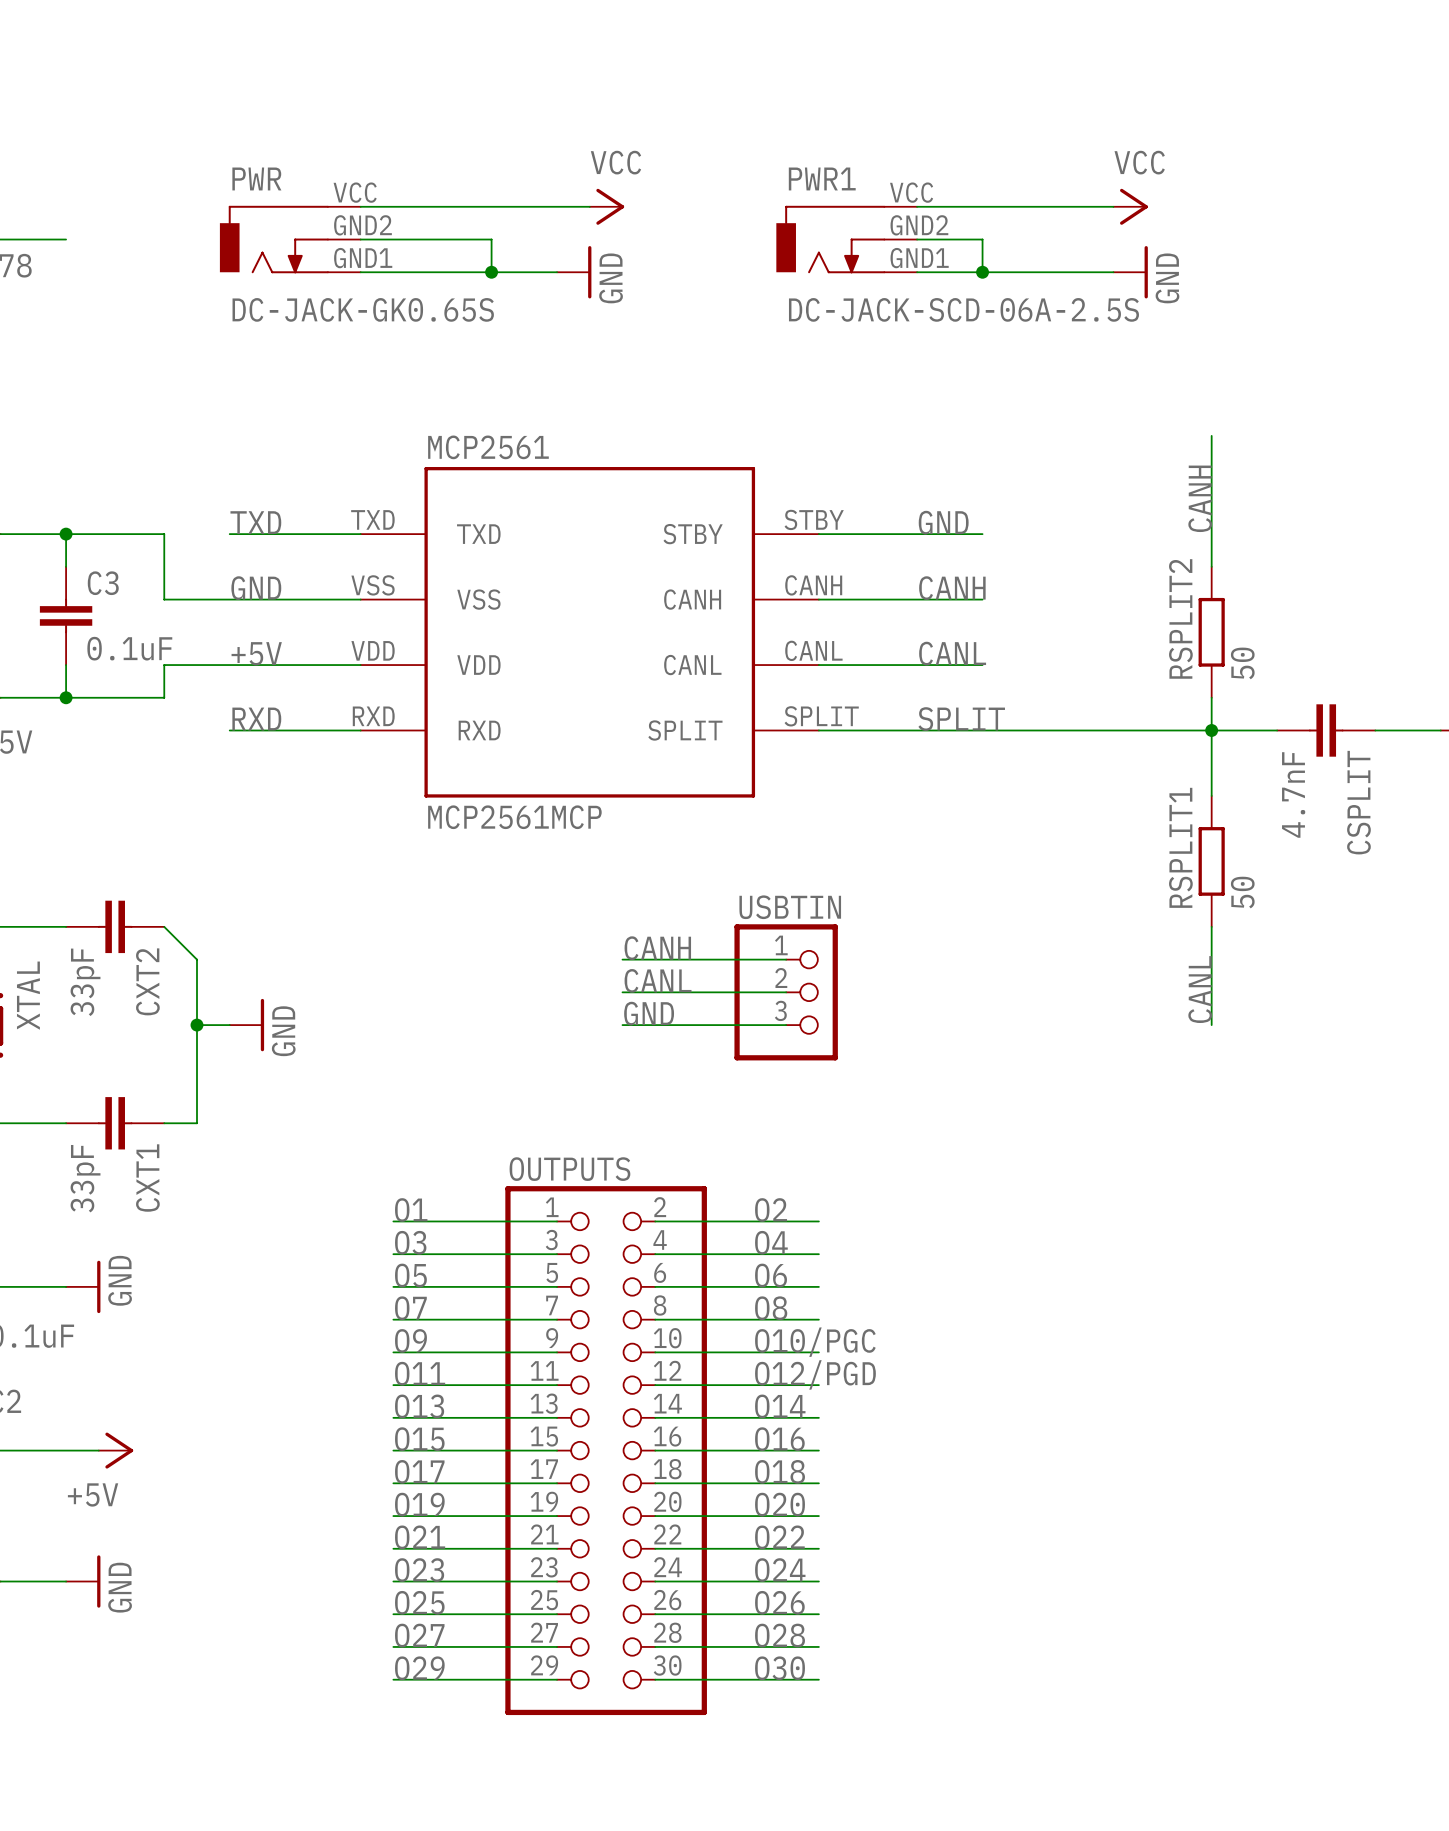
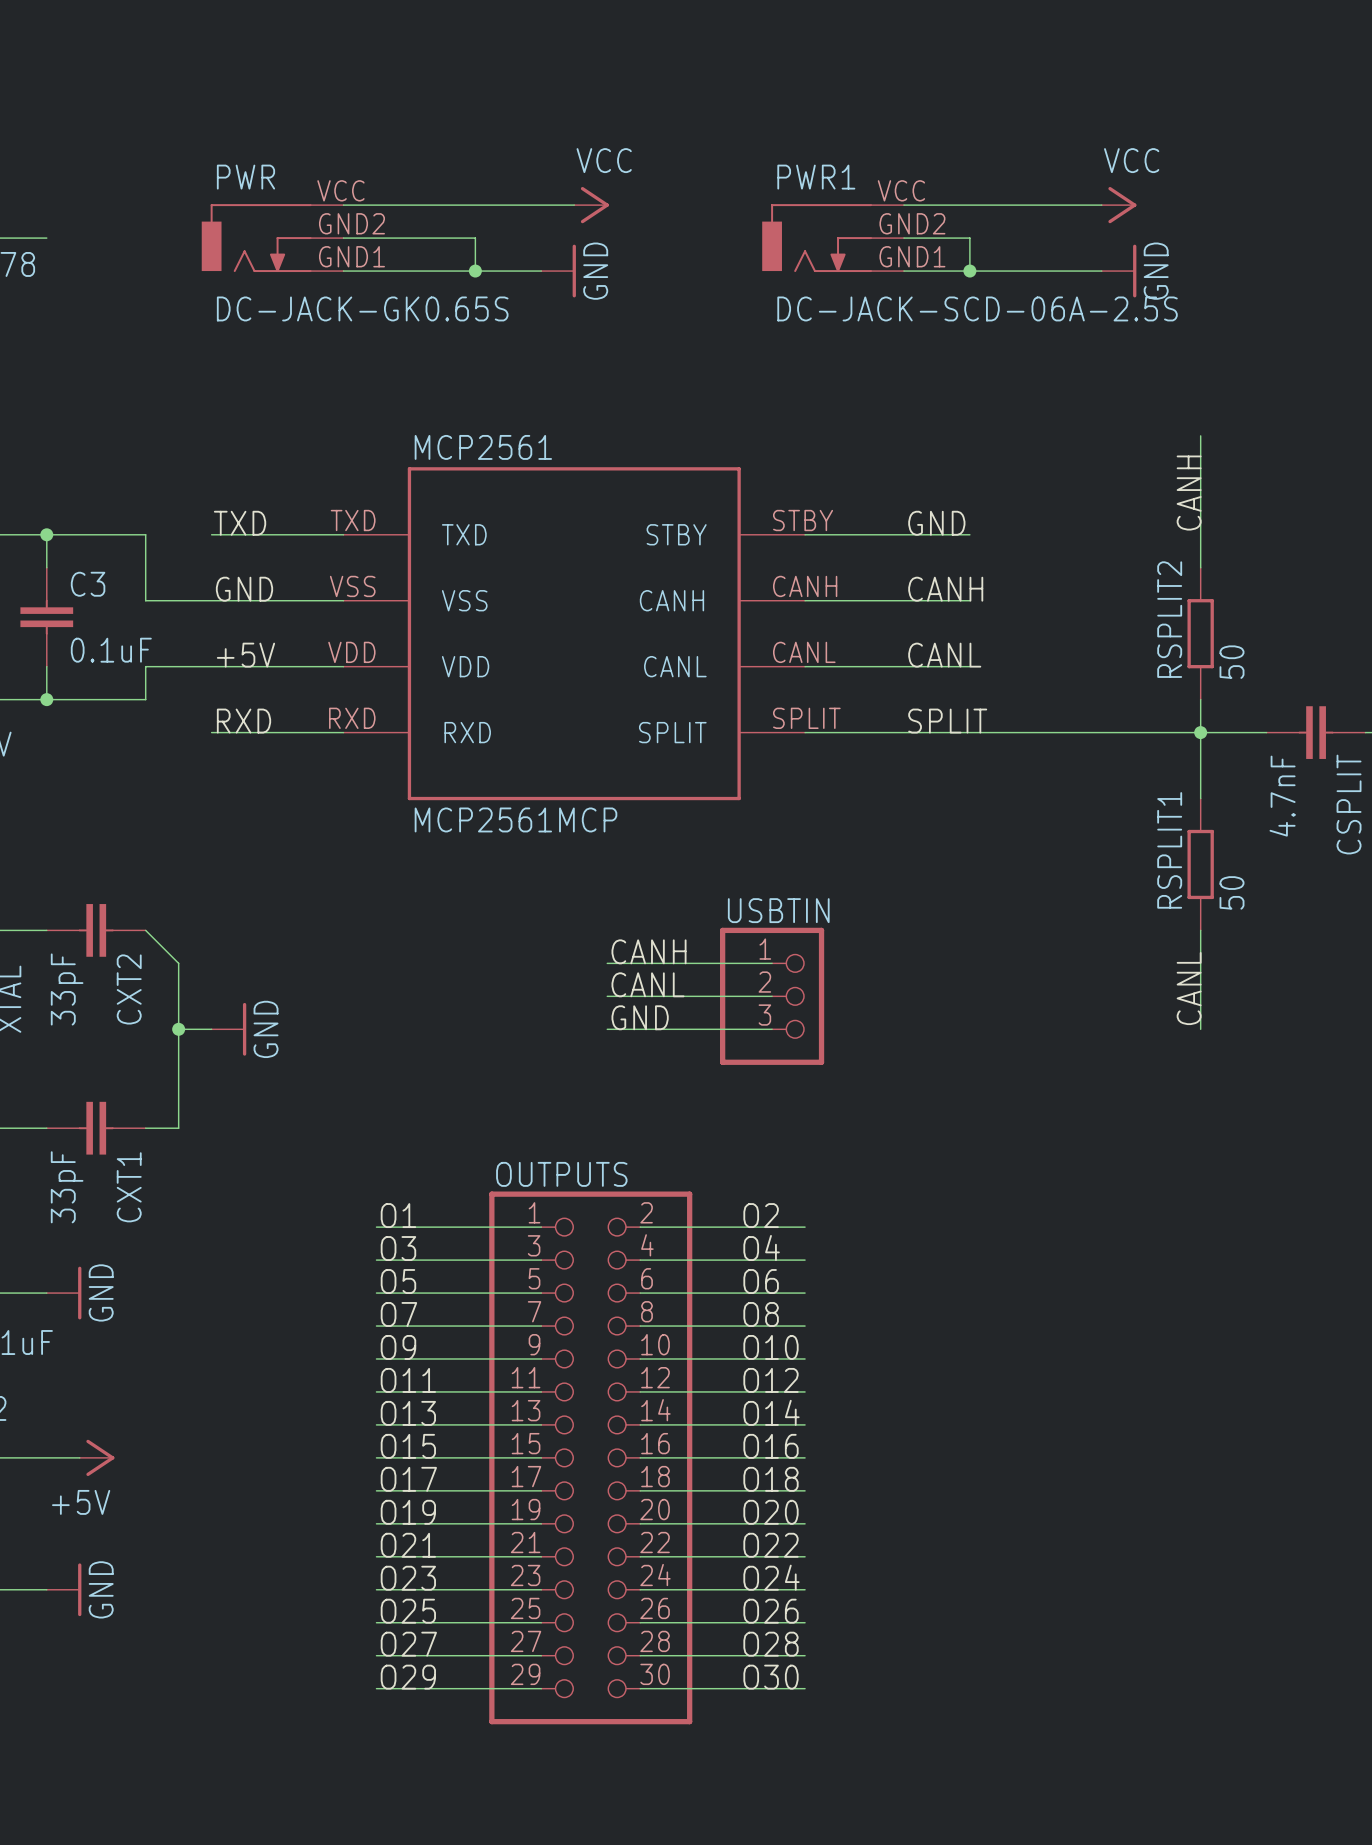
label: O10/PGC (815, 1342) -> O10 (770, 1347)
label: O12/PGD (815, 1374) -> O12 (770, 1380)

